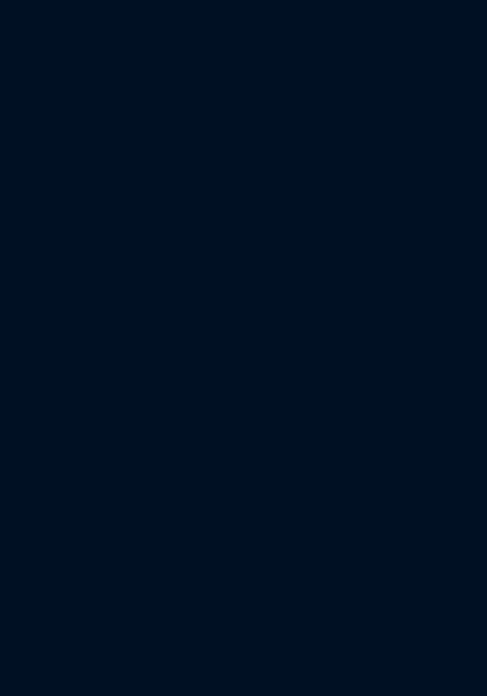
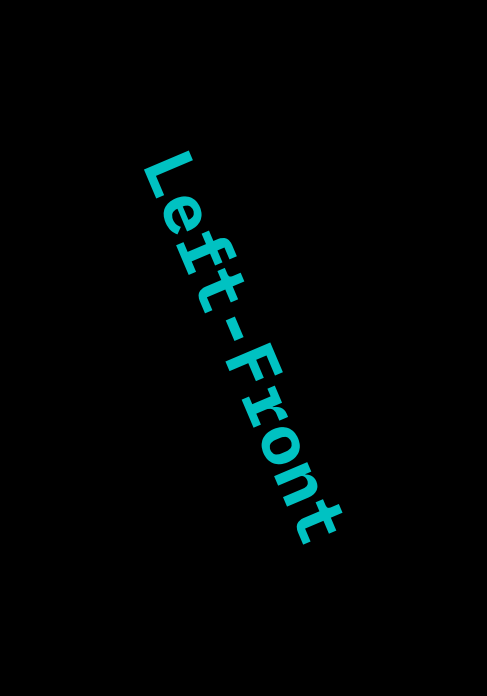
text: none -> Left-Front (243, 347)

